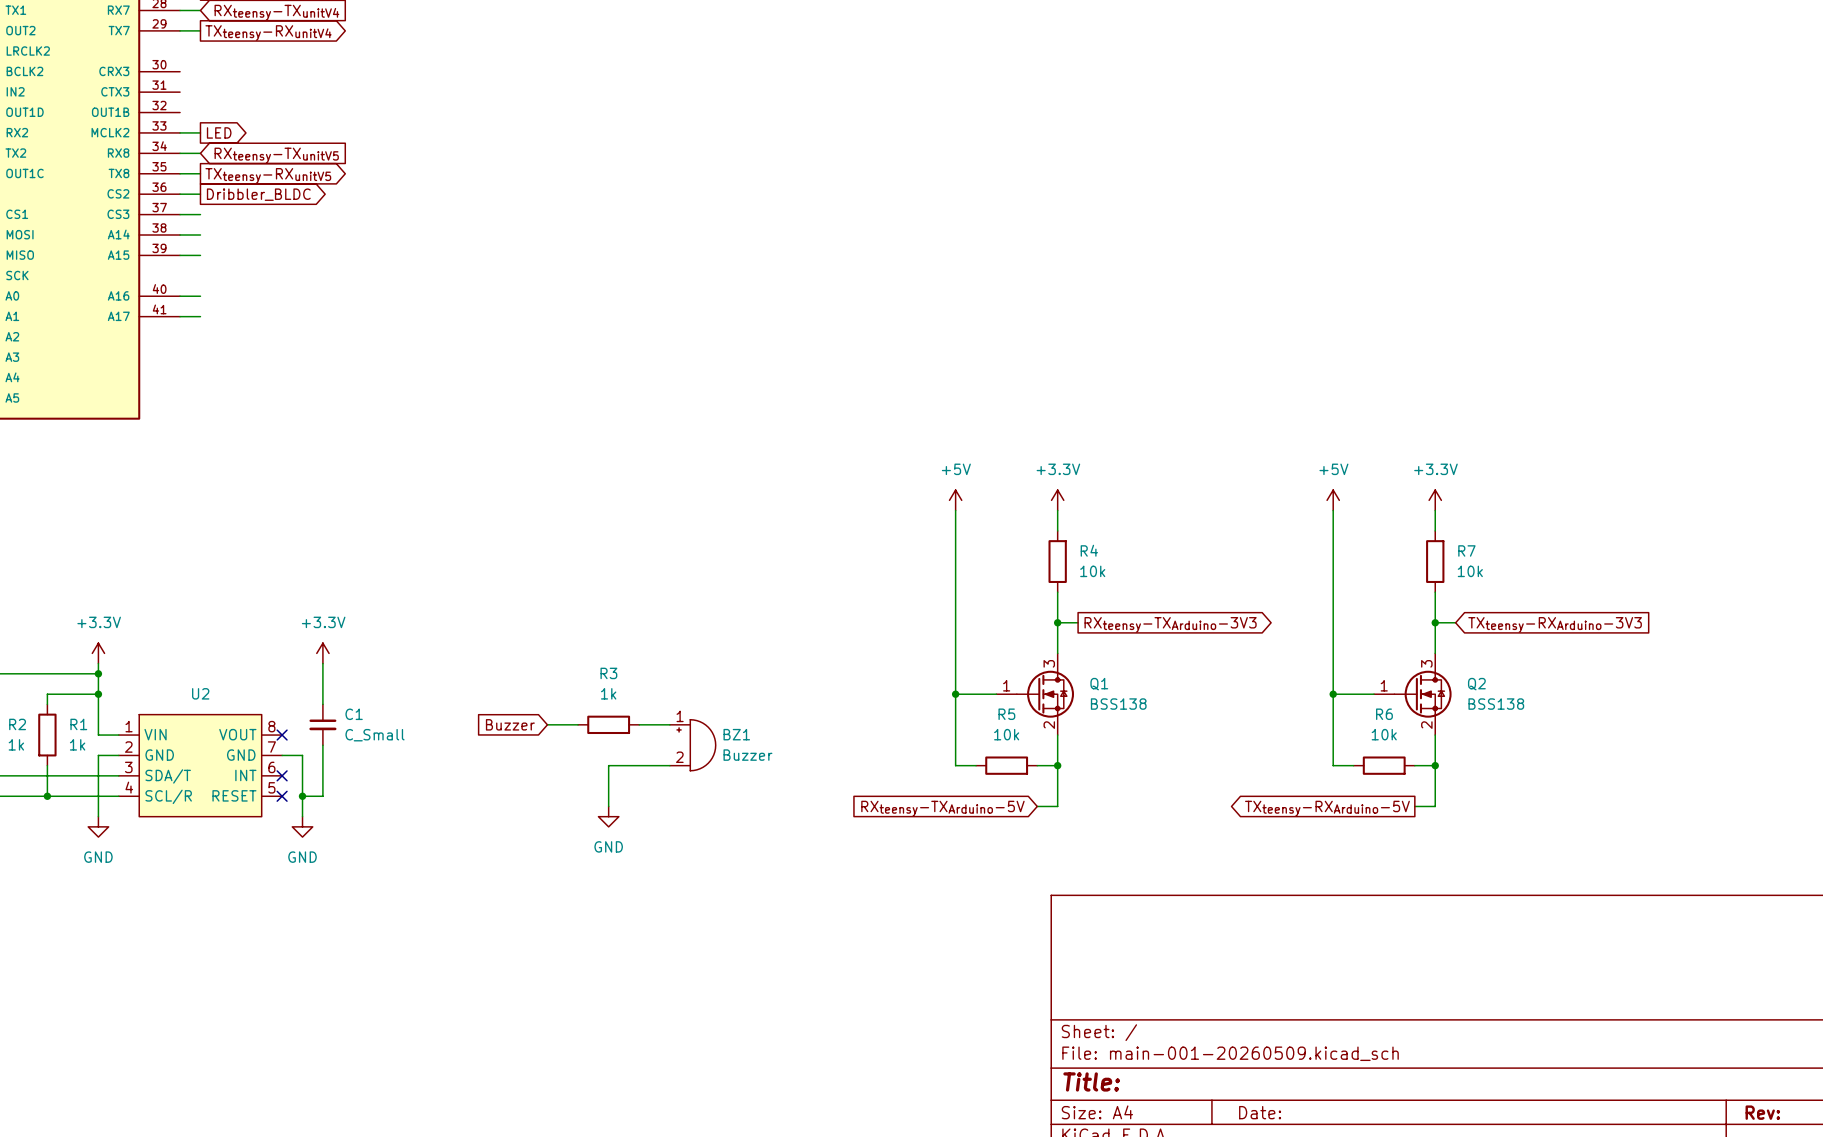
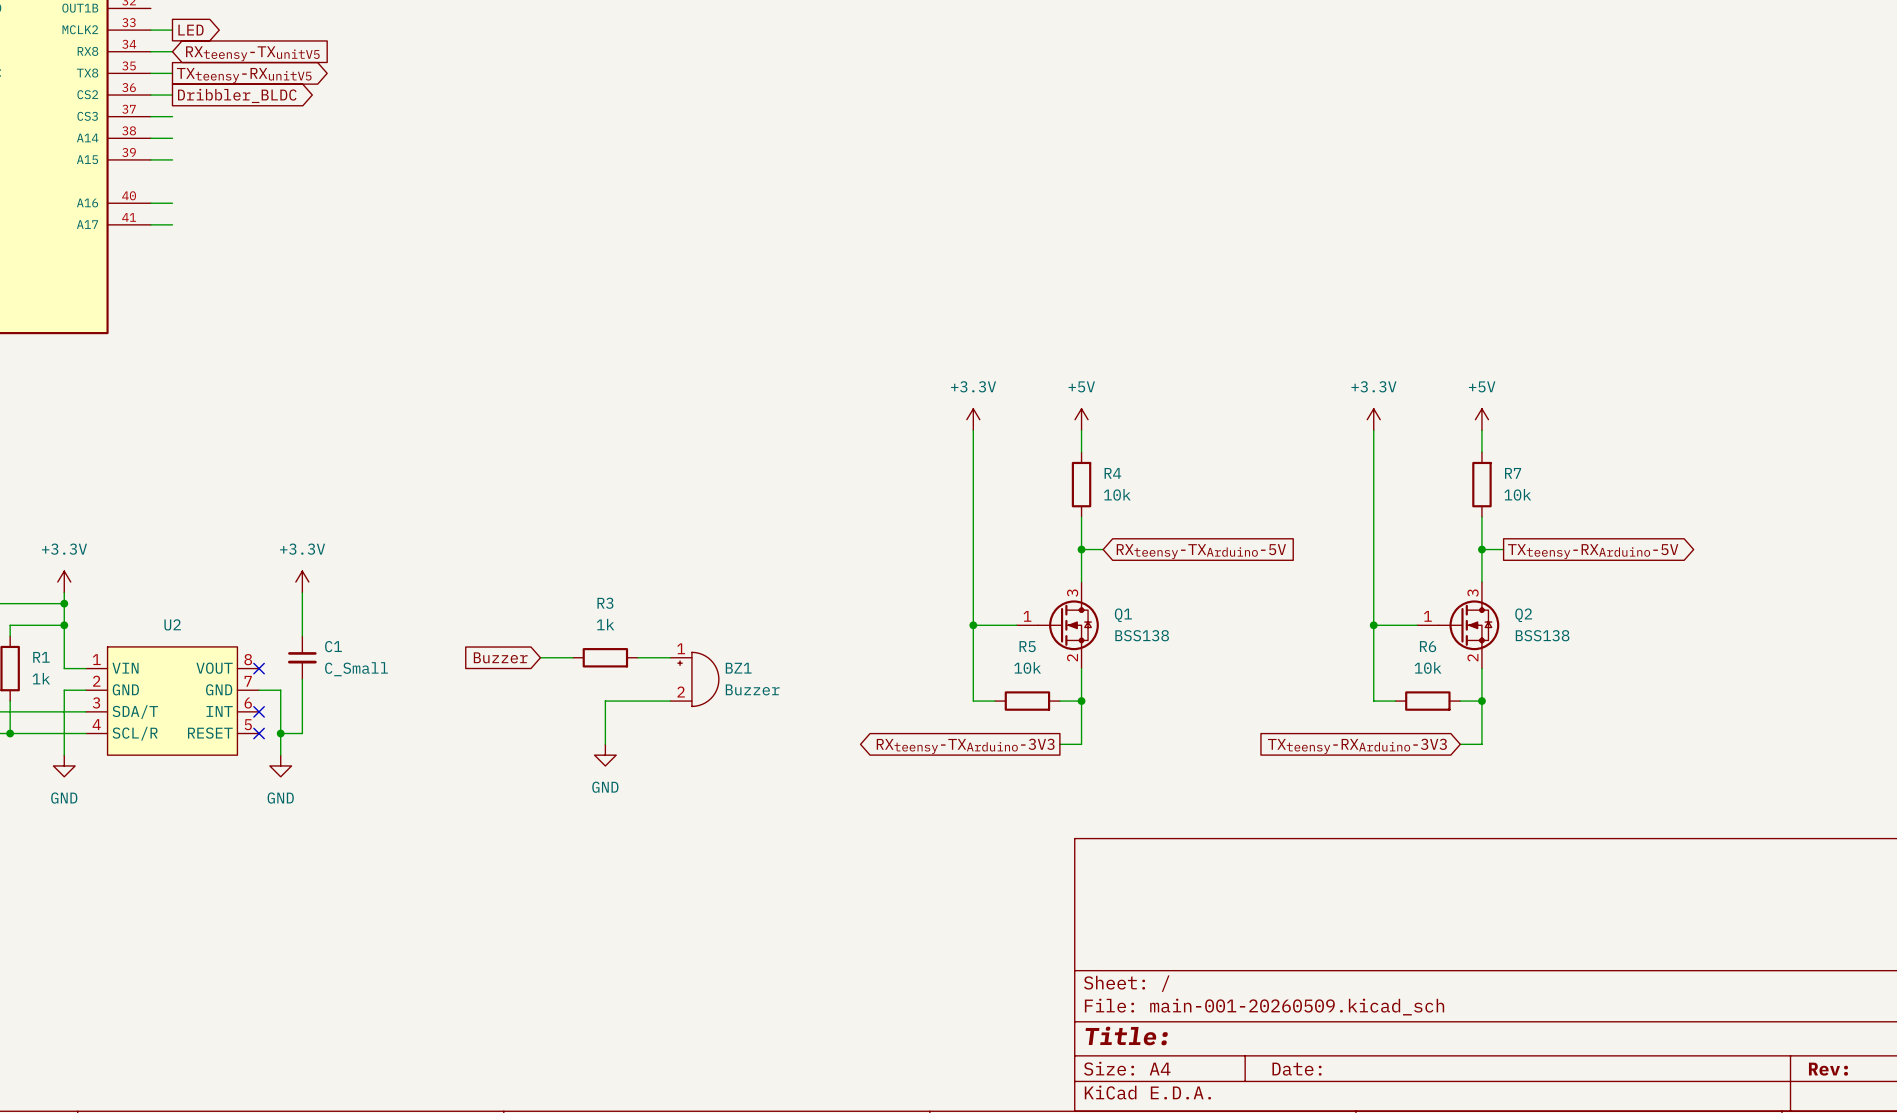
power symbol: +5V (955, 500) -> +3.3V (973, 419)
power symbol: +3.3V (1057, 500) -> +5V (1081, 419)
power symbol: +5V (1333, 500) -> +3.3V (1373, 419)
power symbol: +3.3V (1435, 500) -> +5V (1481, 419)
global label shape: output (1170, 624) -> input (1201, 551)
global label: RXteensy-TXArduino-3V3 (1170, 624) -> RXteensy-TXArduino-5V (1201, 551)
global label shape: input (1555, 624) -> output (1593, 551)
global label: TXteensy-RXArduino-3V3 (1555, 624) -> TXteensy-RXArduino-5V (1593, 551)
global label shape: input (942, 808) -> output (965, 746)
global label: RXteensy-TXArduino-5V (942, 808) -> RXteensy-TXArduino-3V3 (965, 746)
global label shape: output (1327, 808) -> input (1357, 746)
global label: TXteensy-RXArduino-5V (1327, 808) -> TXteensy-RXArduino-3V3 (1357, 746)

